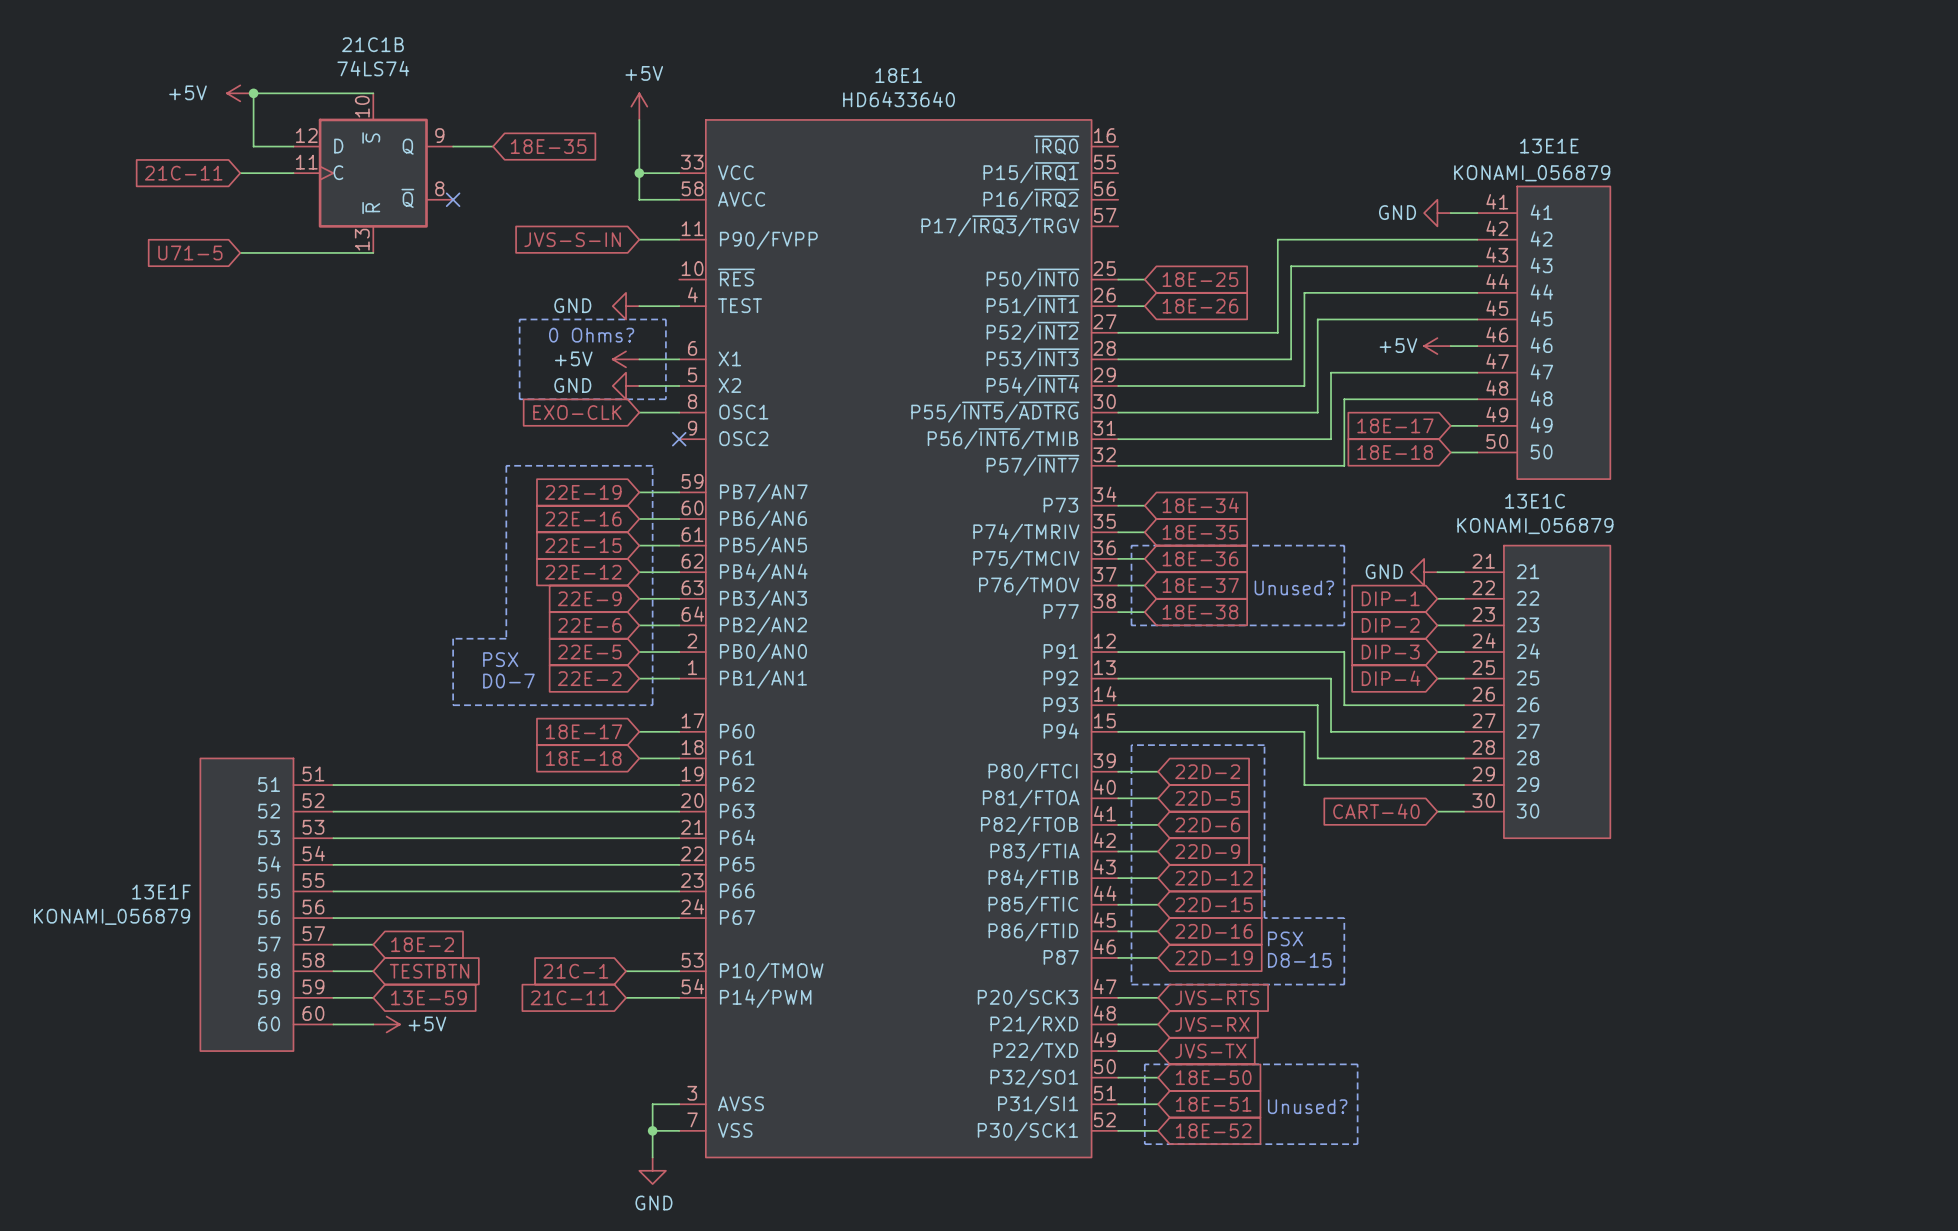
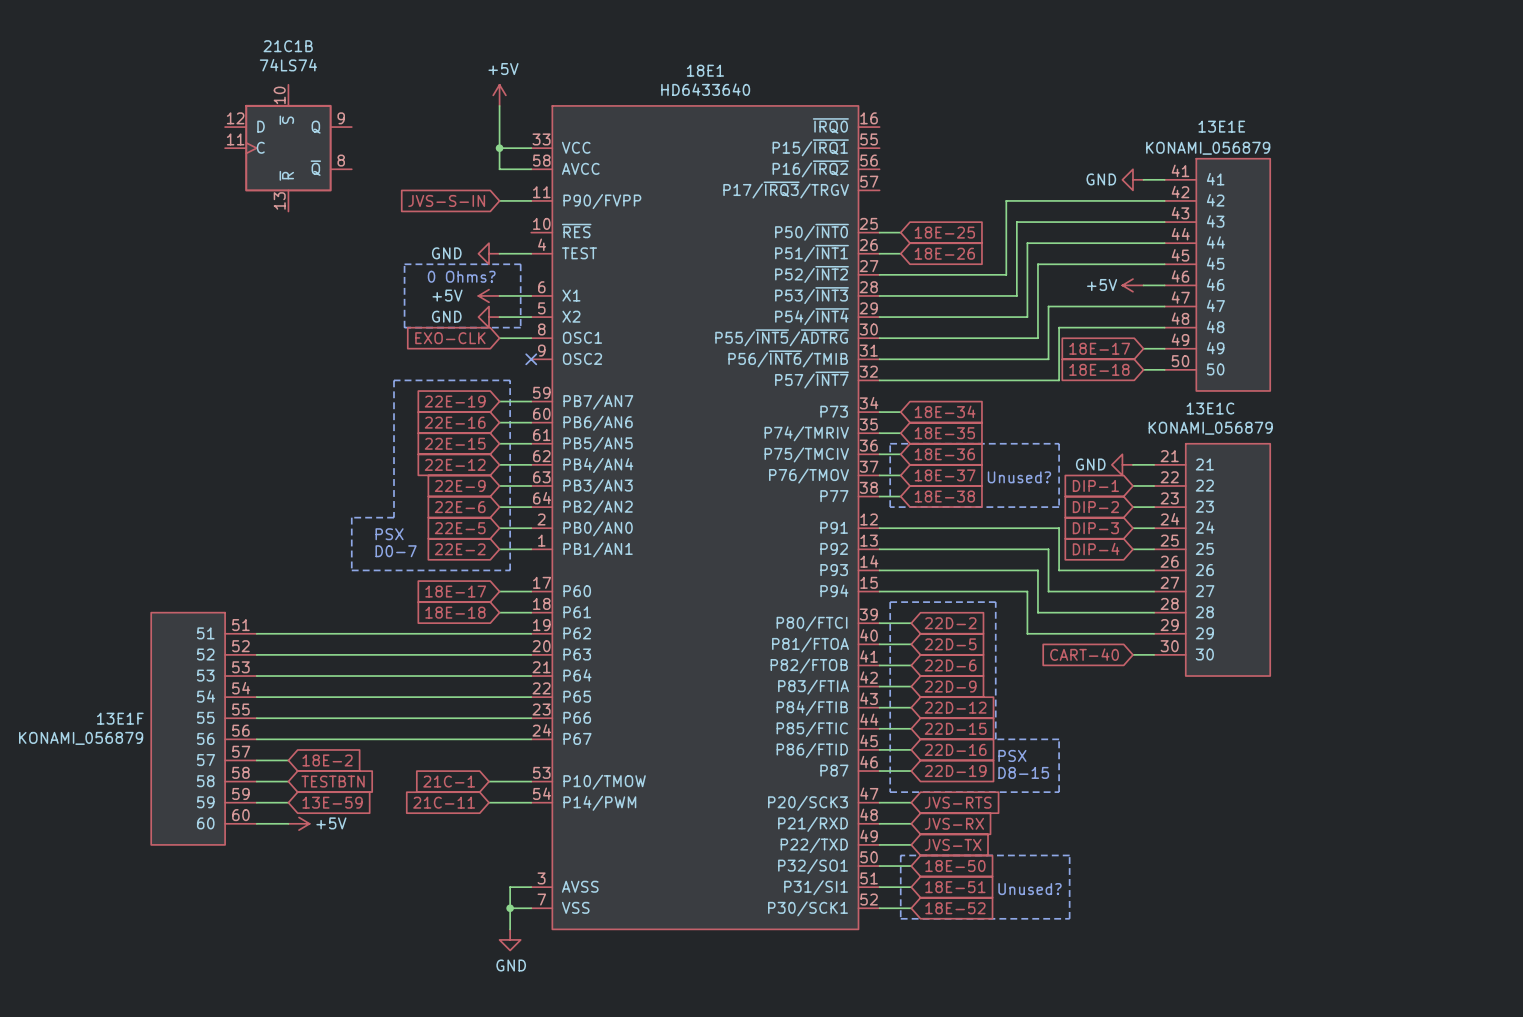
power symbol: +5V (240, 93) -> none
junction: (253, 93) -> none
wire: (373, 93) (253, 93) (253, 146) (293, 146) -> none
wire: (453, 146) (493, 146) -> none
global label: 18E-35 (548, 146) -> none
global label: 21C-11 (183, 173) -> none
wire: (240, 173) (293, 173) -> none
no-connect mark: (453, 199) -> none
global label: U71-5 (190, 252) -> none
wire: (240, 252) (373, 252) -> none

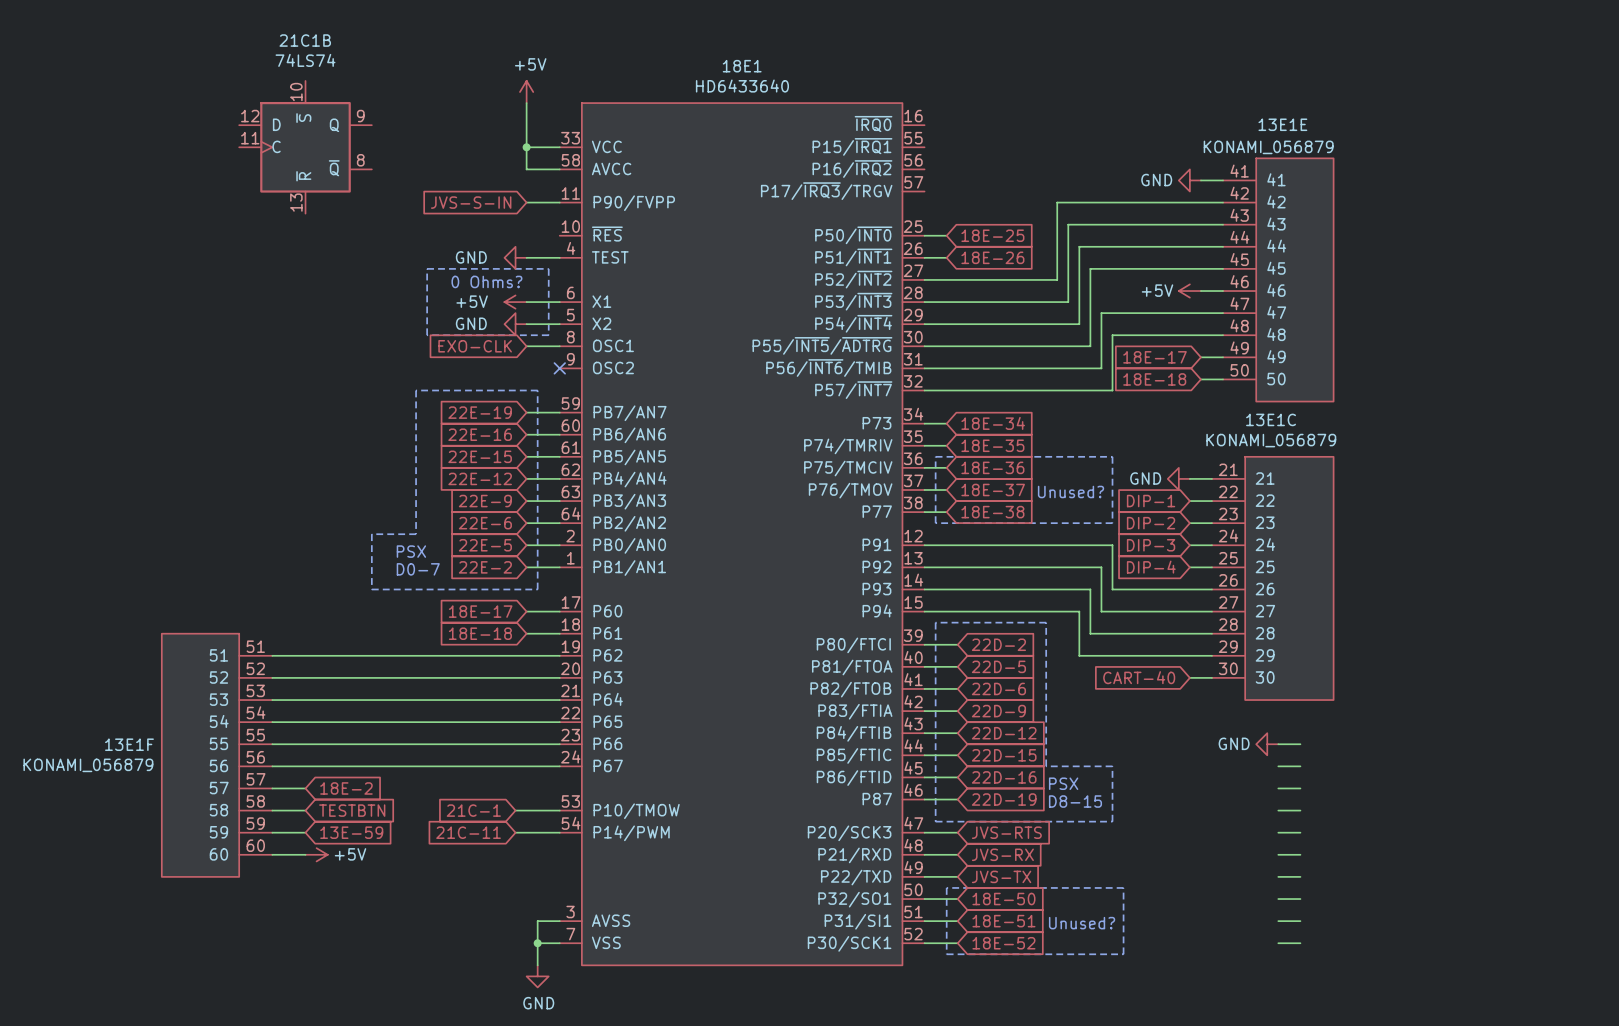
power symbol: none -> GND (1267, 744)
wire: none -> (1278, 744) (1300, 744)
wire: none -> (1278, 766) (1300, 766)
wire: none -> (1278, 788) (1300, 788)
wire: none -> (1278, 810) (1300, 810)
wire: none -> (1278, 832) (1300, 832)
wire: none -> (1278, 854) (1300, 854)
wire: none -> (1278, 876) (1300, 876)
wire: none -> (1278, 899) (1300, 899)
wire: none -> (1278, 921) (1300, 921)
wire: none -> (1278, 943) (1300, 943)

